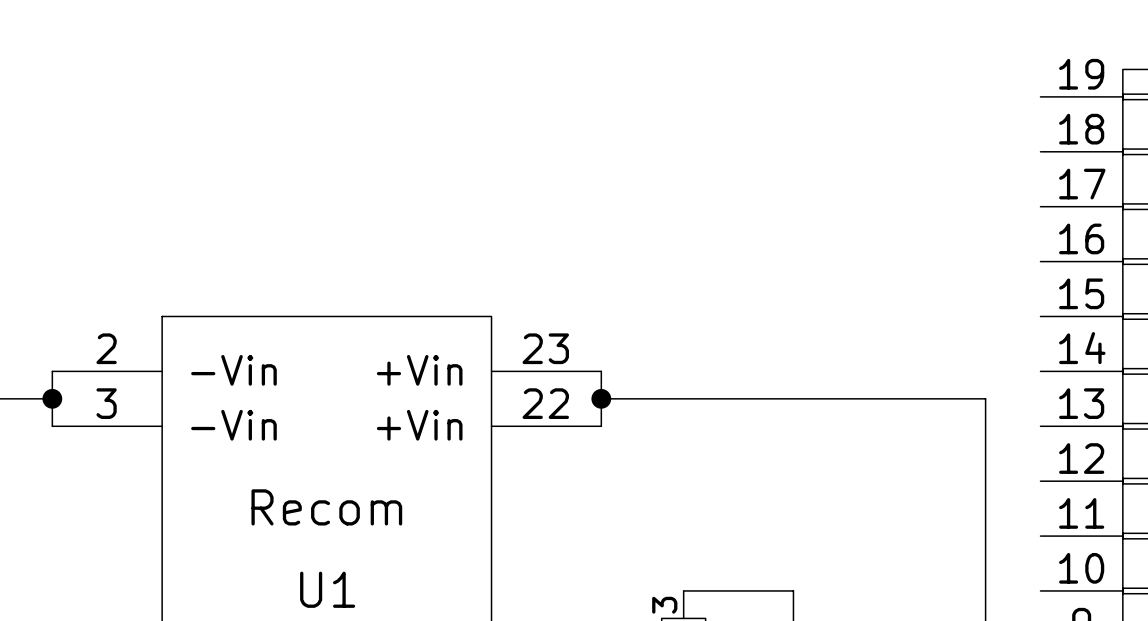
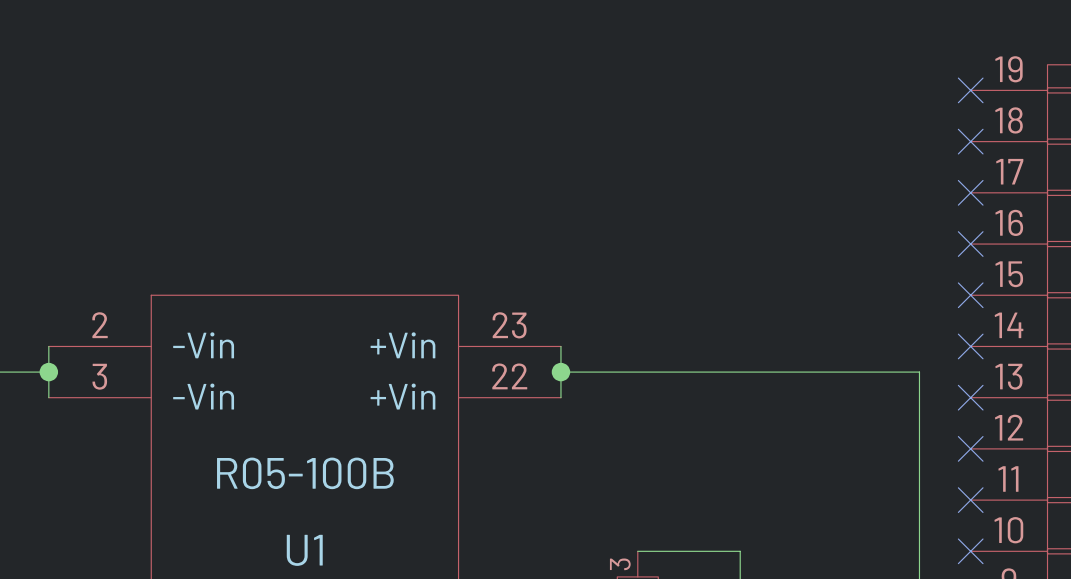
no-connect mark: none -> (970, 90)
no-connect mark: none -> (970, 141)
no-connect mark: none -> (970, 192)
no-connect mark: none -> (970, 244)
no-connect mark: none -> (970, 295)
no-connect mark: none -> (970, 346)
no-connect mark: none -> (970, 397)
no-connect mark: none -> (970, 448)
U1 value: Recom (326, 507) -> R05-100B (305, 473)
no-connect mark: none -> (970, 500)
no-connect mark: none -> (970, 551)

